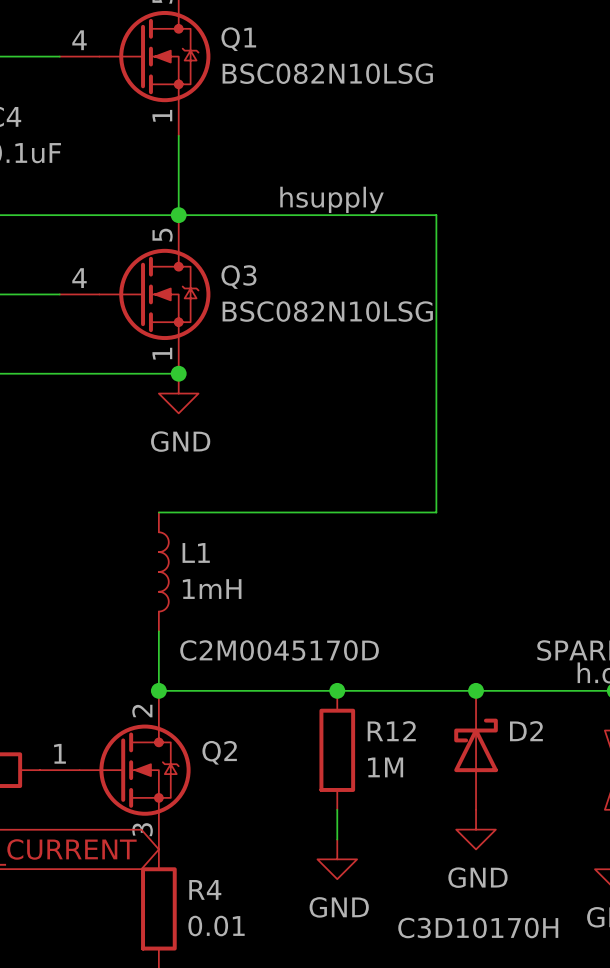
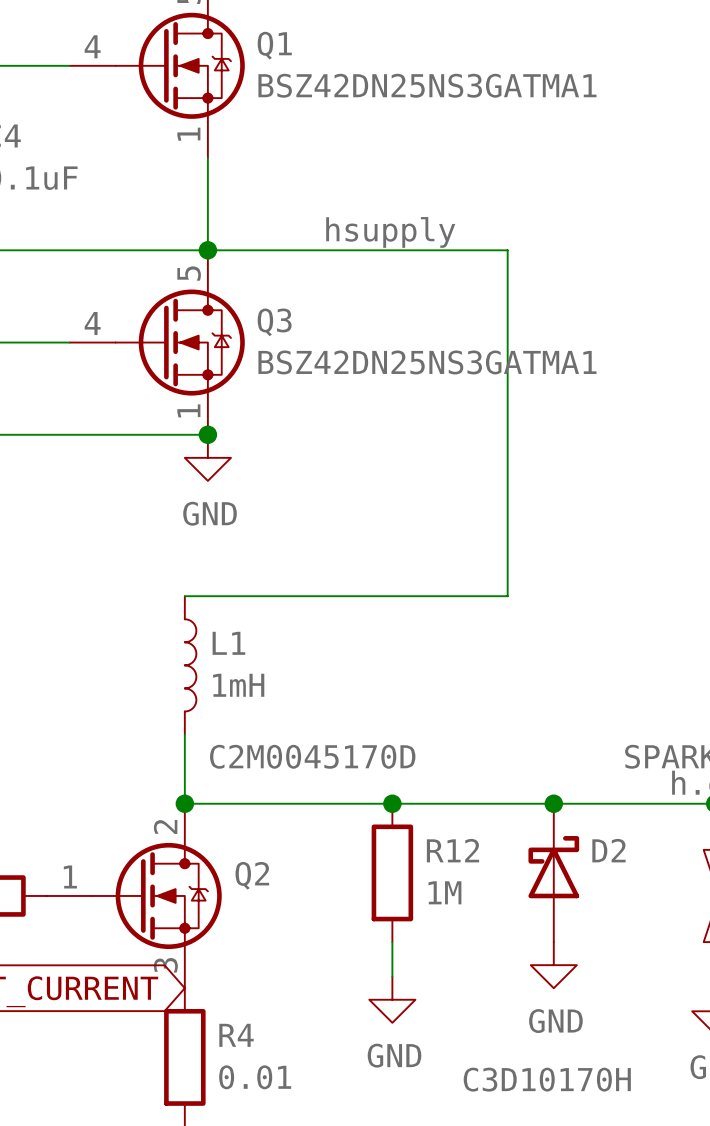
Q1 value: BSC082N10LSG (327, 73) -> BSZ42DN25NS3GATMA1 (427, 85)
Q3 value: BSC082N10LSG (327, 311) -> BSZ42DN25NS3GATMA1 (427, 362)

